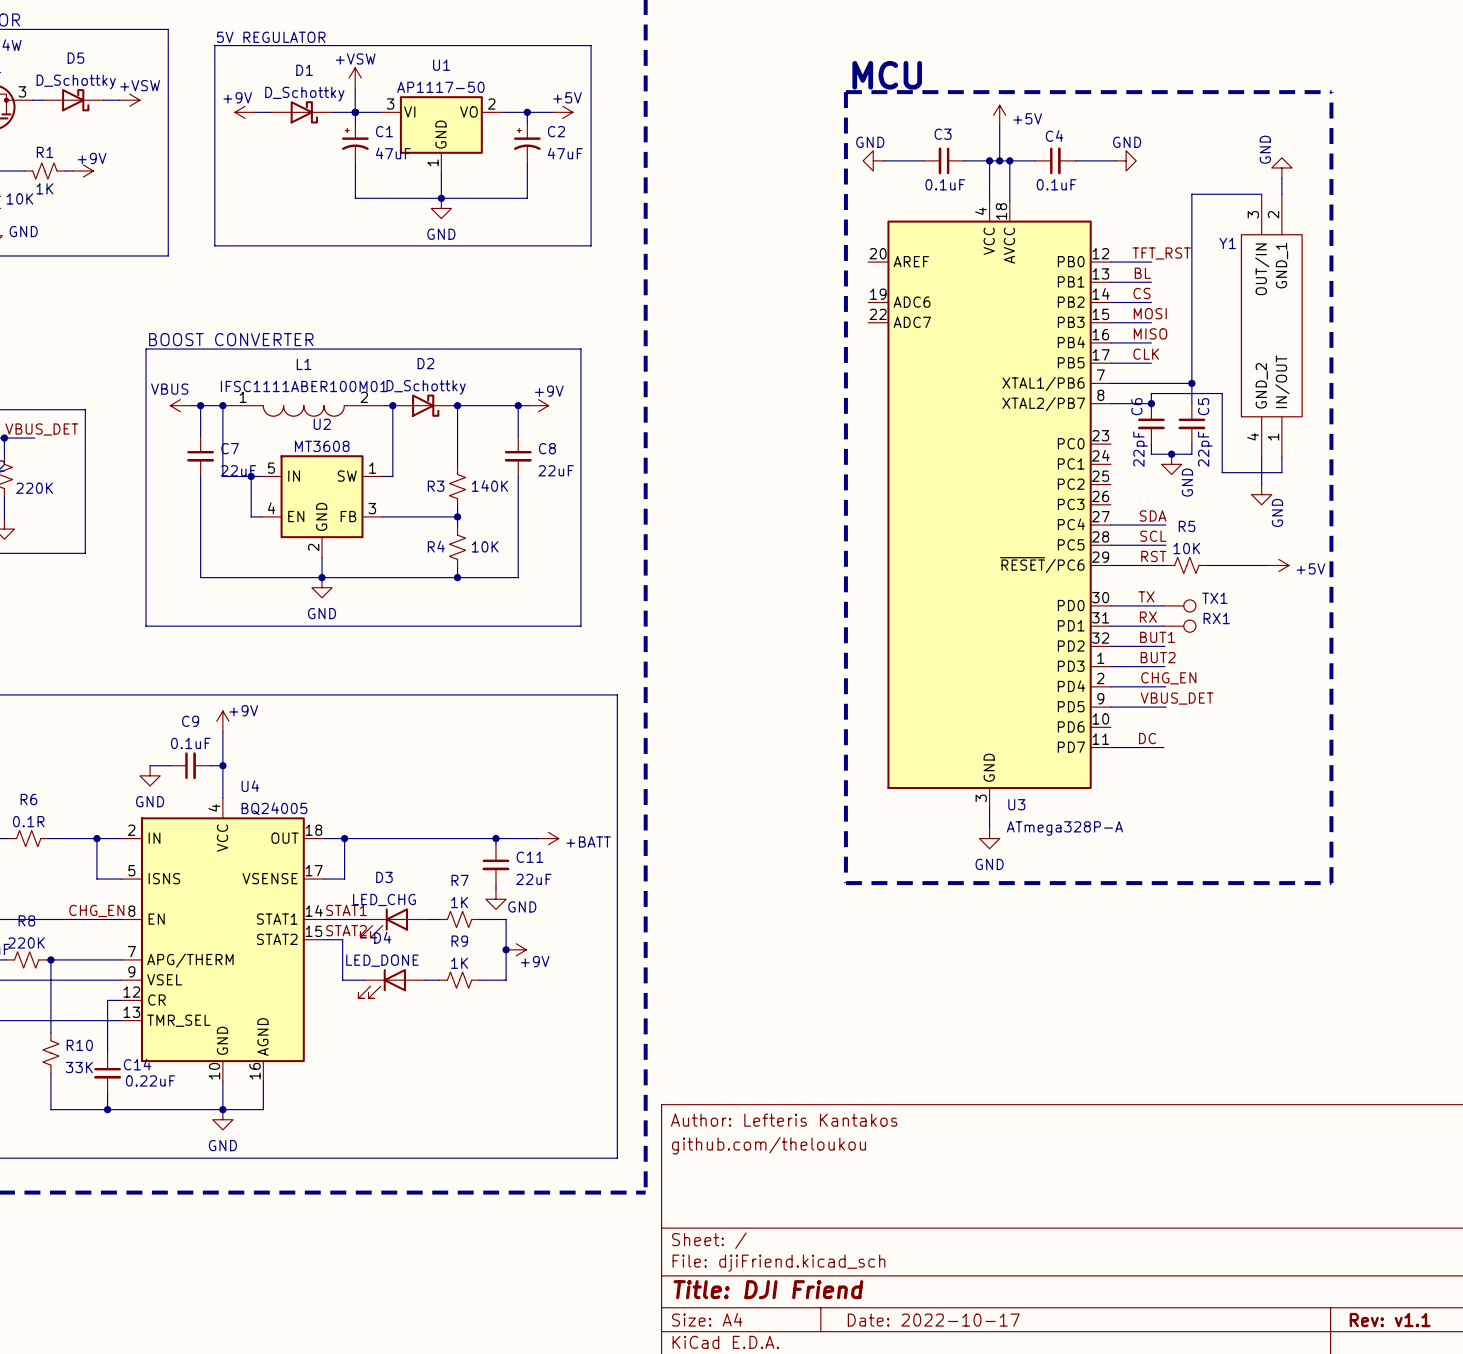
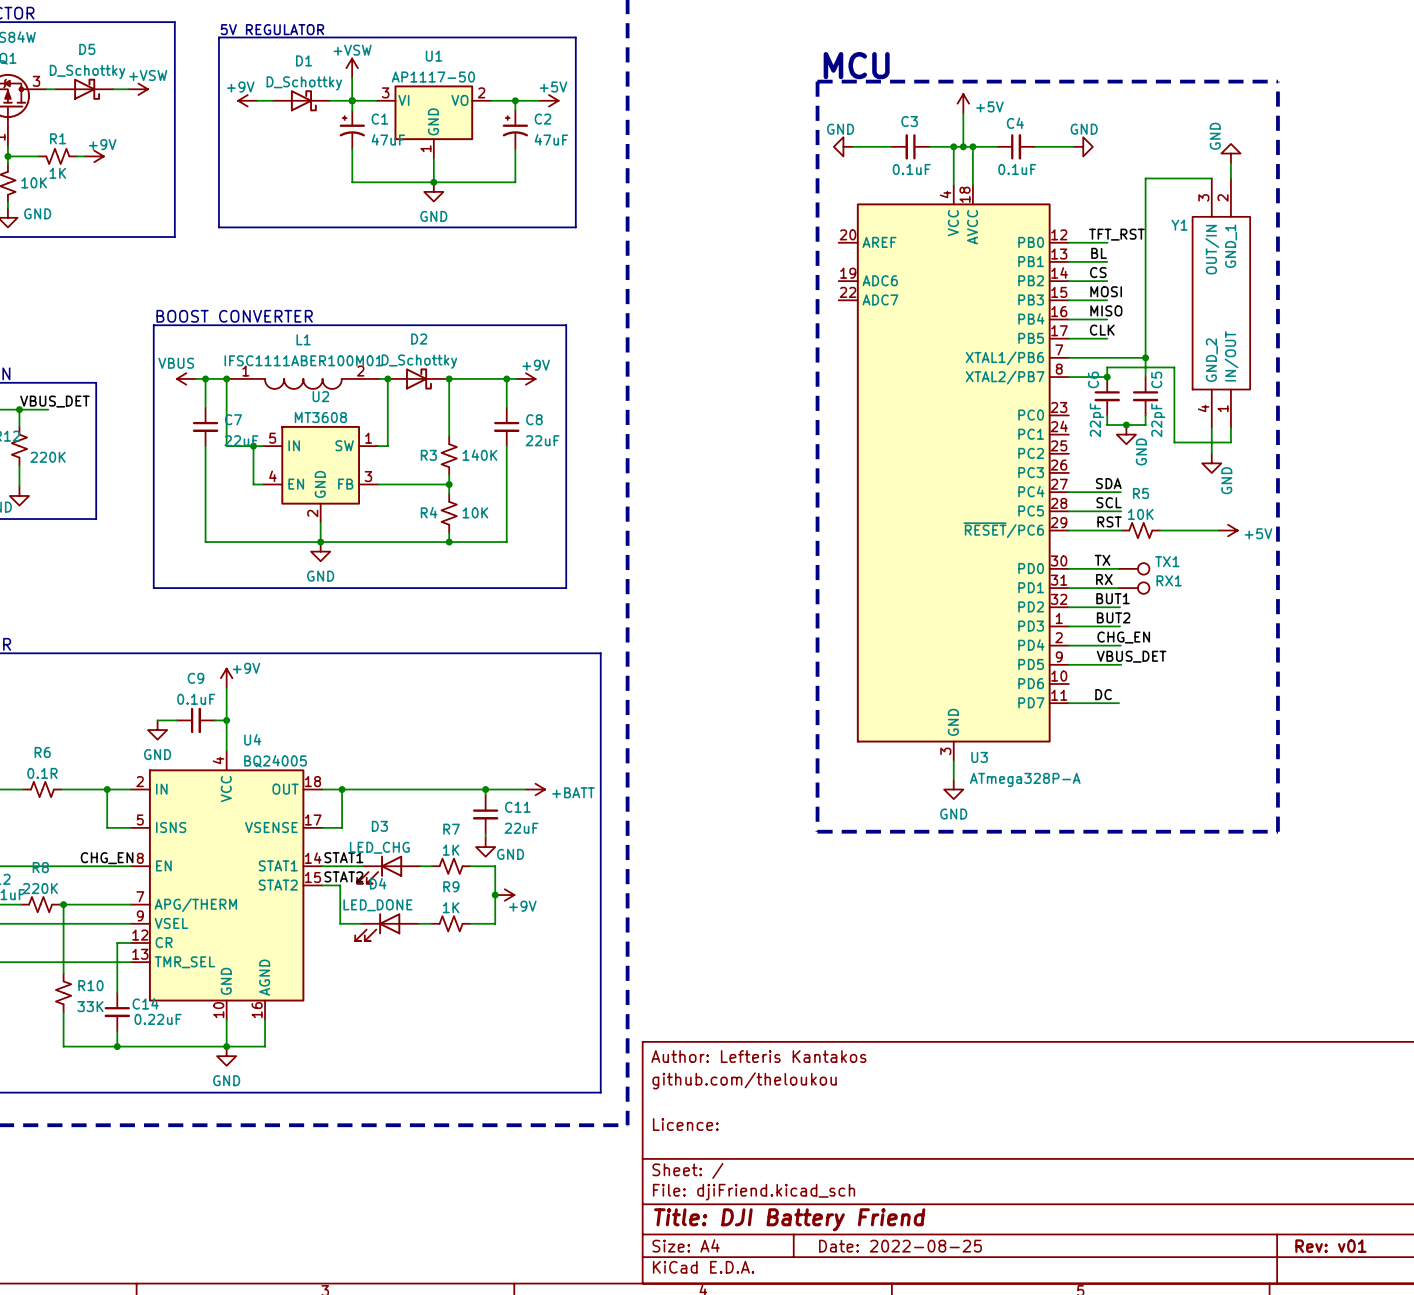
title block: none -> Licence: (685, 1124)
title block: Title: DJI Friend (768, 1289) -> Title: DJI Battery Friend (789, 1219)
title block: Date: 2022-10-17 (933, 1320) -> Date: 2022-08-25 (900, 1246)
title block: Rev: v1.1 (1390, 1320) -> Rev: v01 (1330, 1246)

